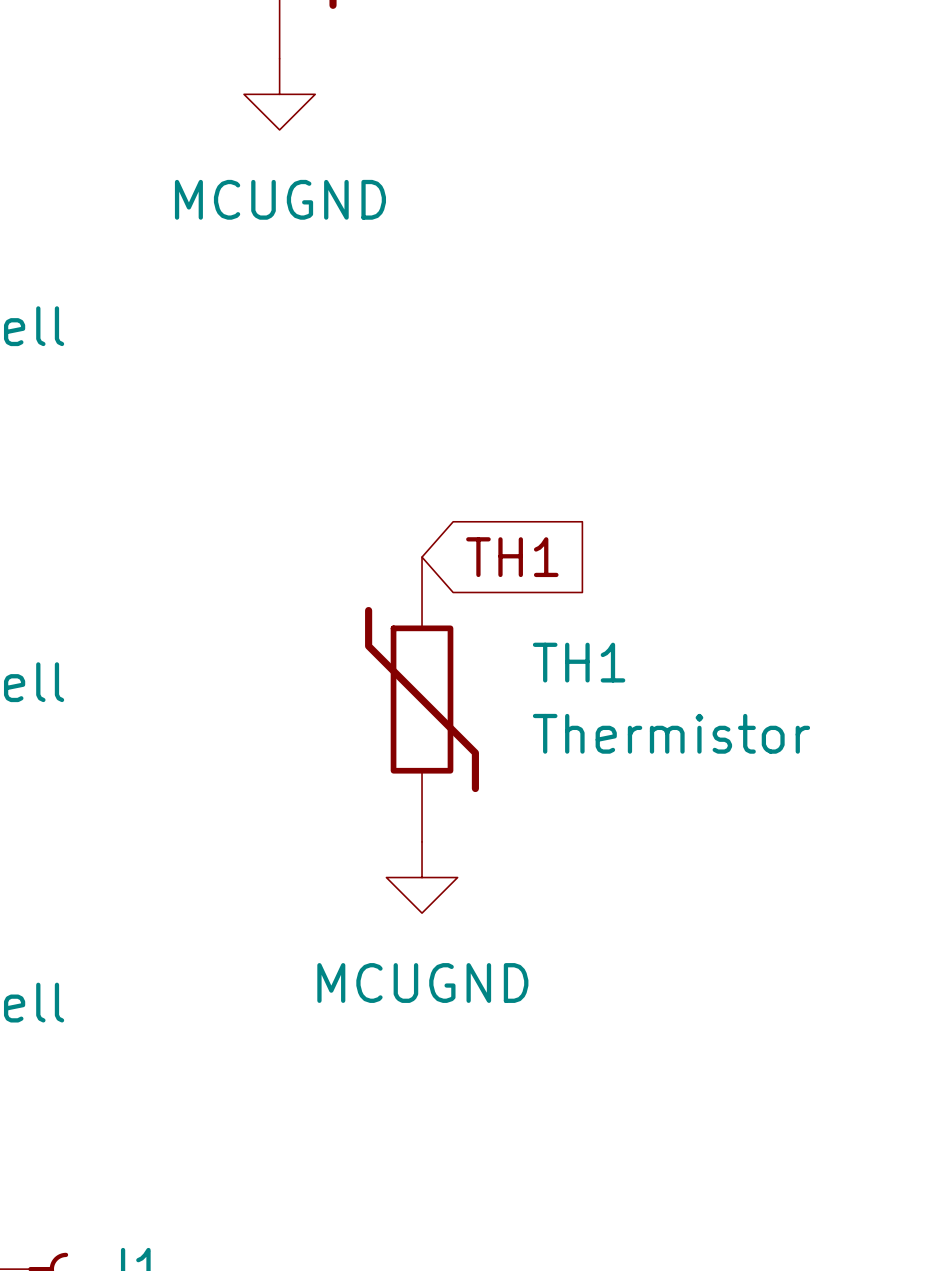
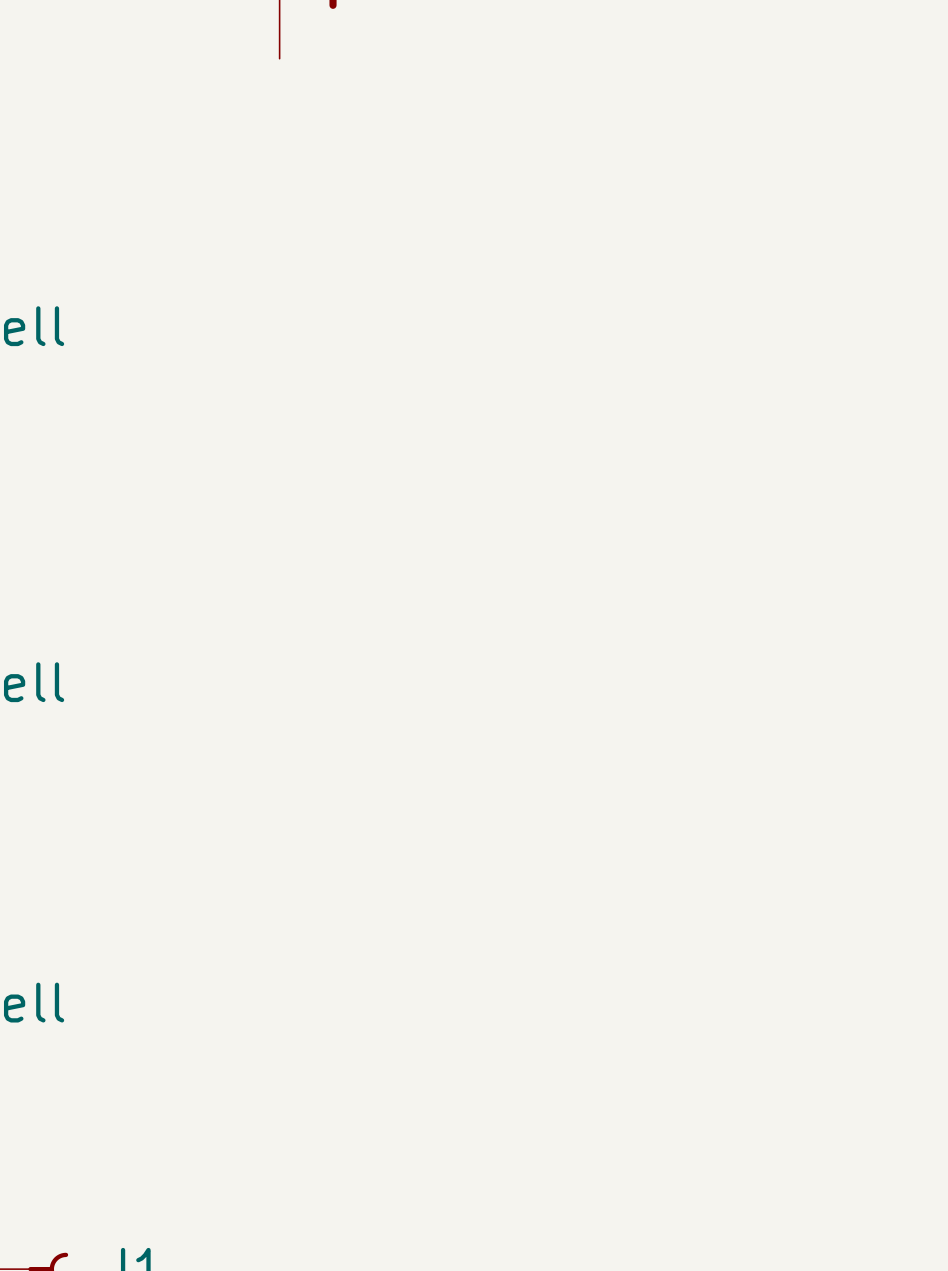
power symbol: MCUGND (279, 94) -> none
global label: TH1 (512, 557) -> none
TH1: Thermistor (422, 699) -> none
power symbol: MCUGND (422, 877) -> none

